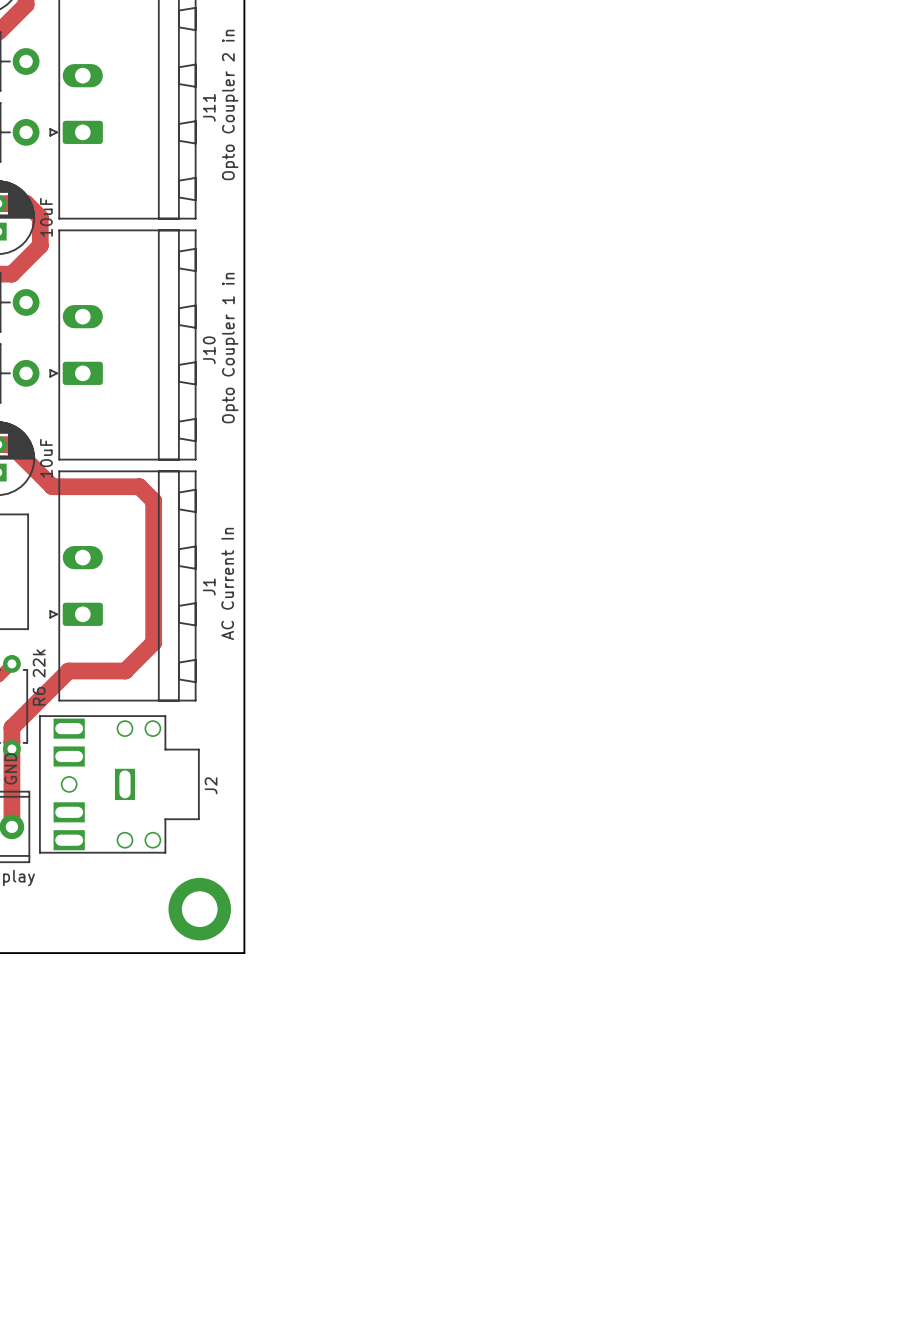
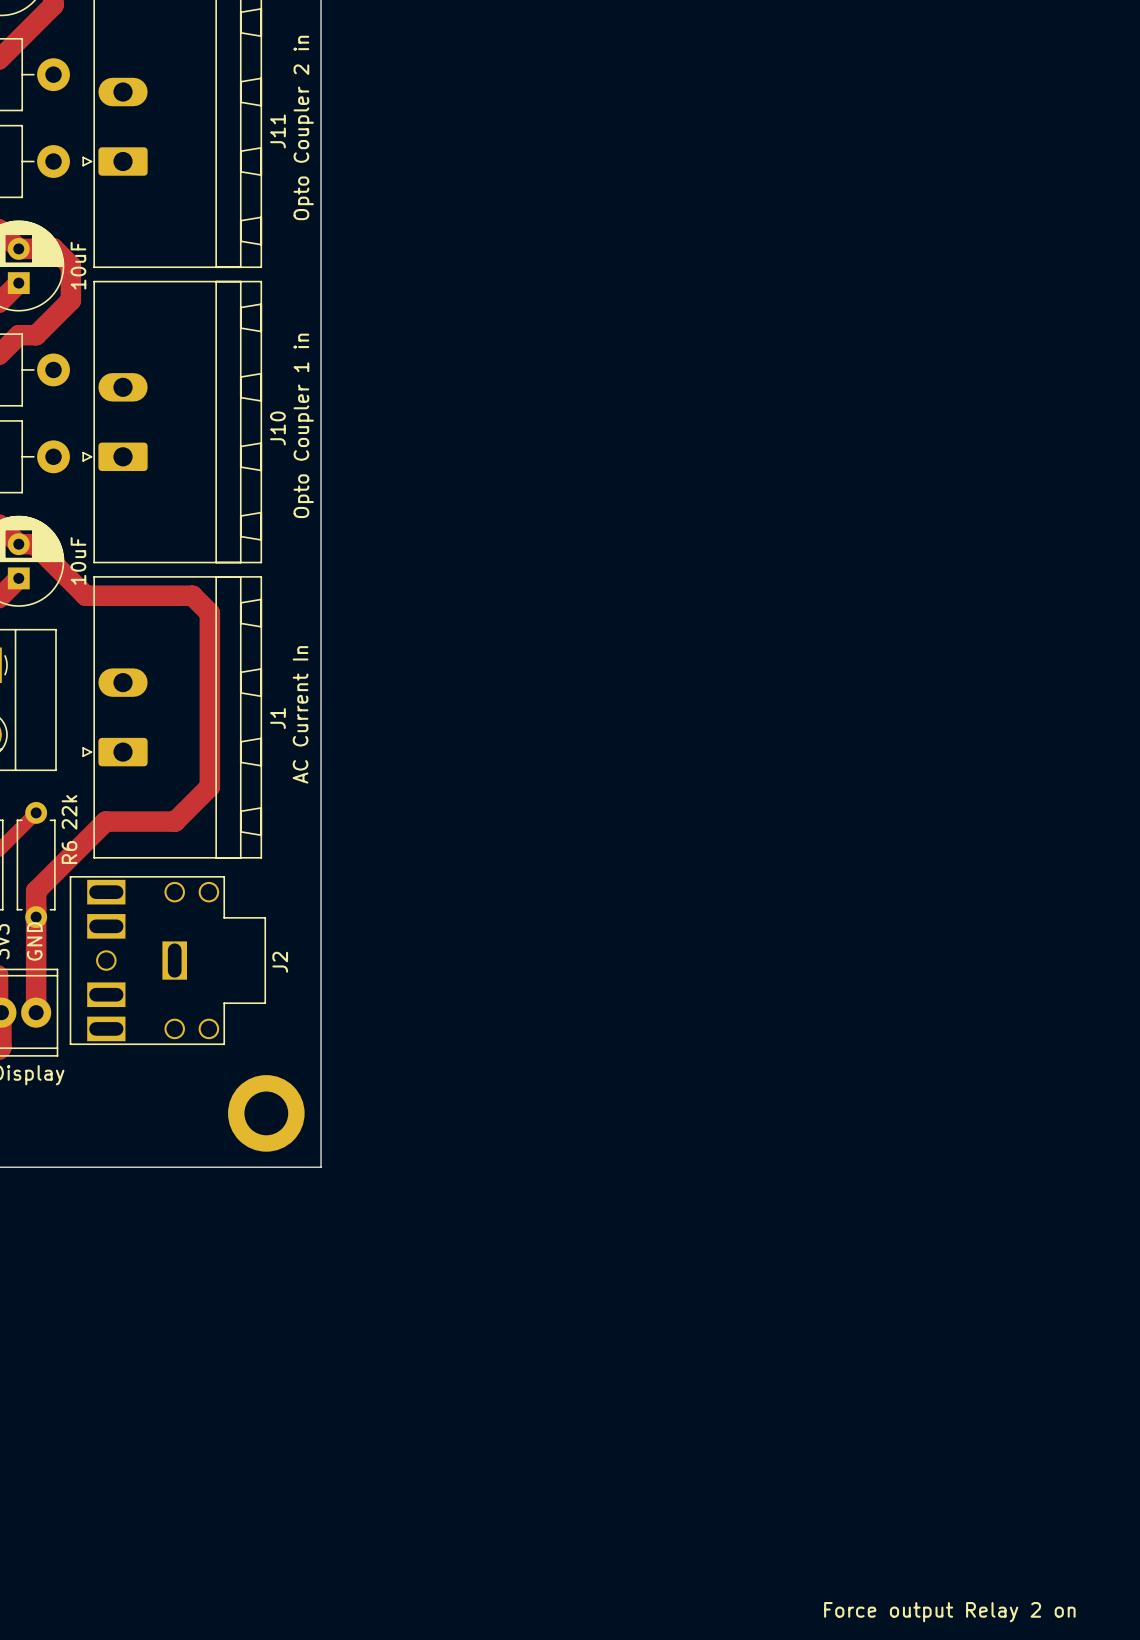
drawing: none -> [824, 1602, 1076, 1623]

